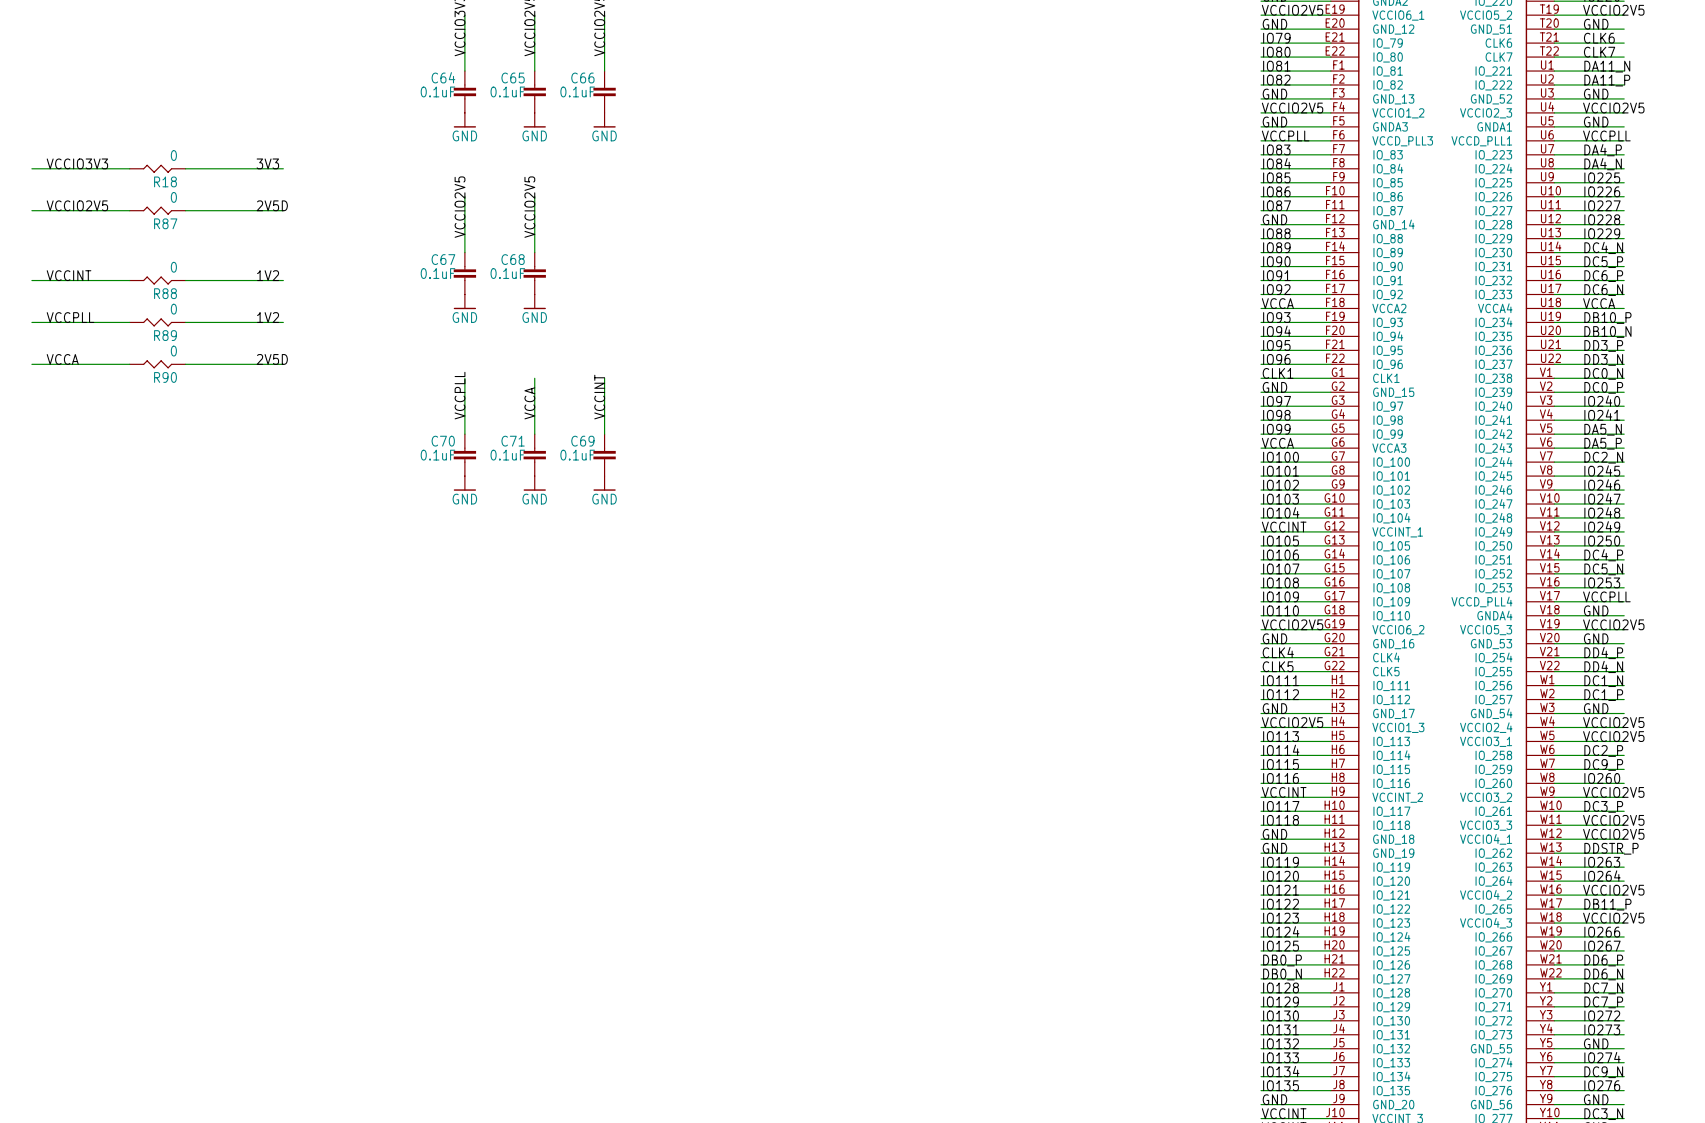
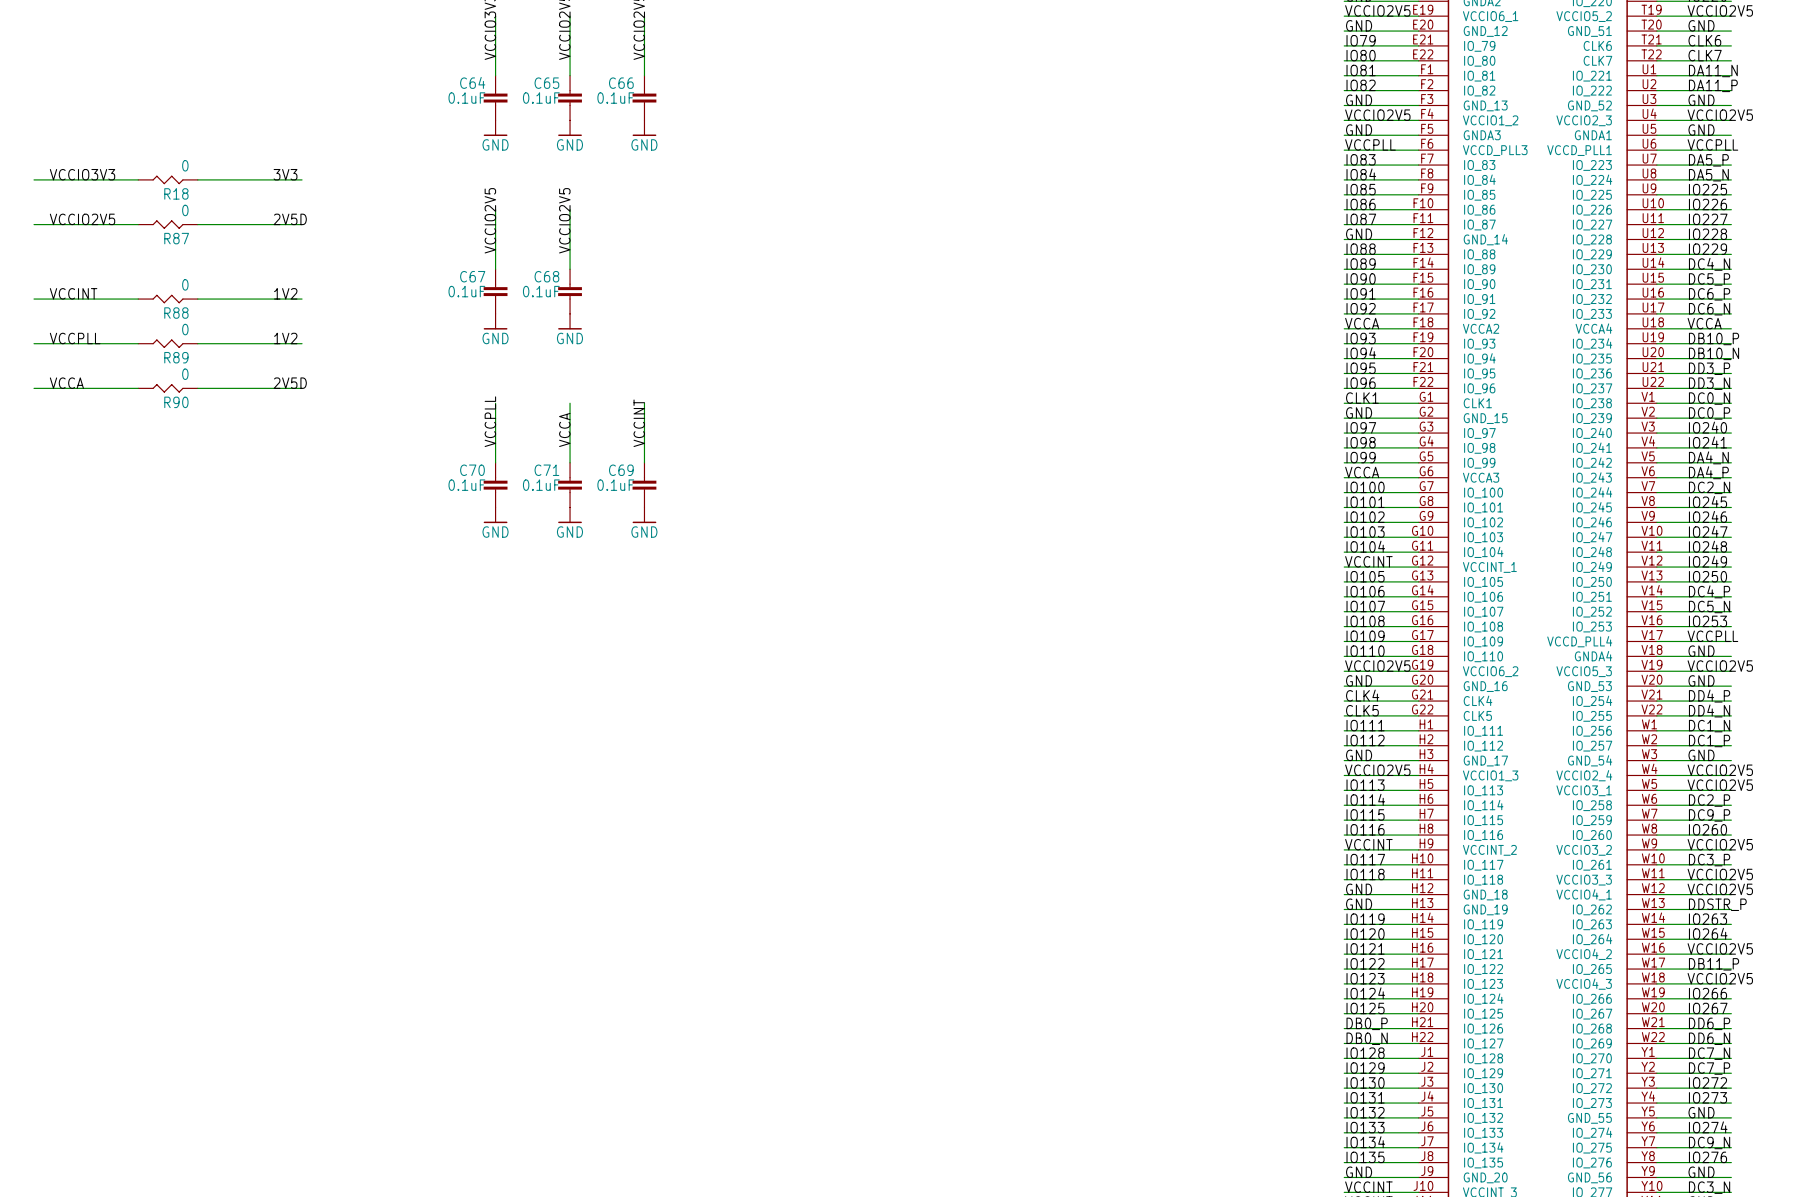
label: DA4_P (1603, 150) -> DA5_P (1708, 160)
label: DA4_N (1603, 164) -> DA5_N (1708, 175)
label: DA5_N (1603, 429) -> DA4_N (1708, 457)
label: DA5_P (1603, 443) -> DA4_P (1708, 472)

